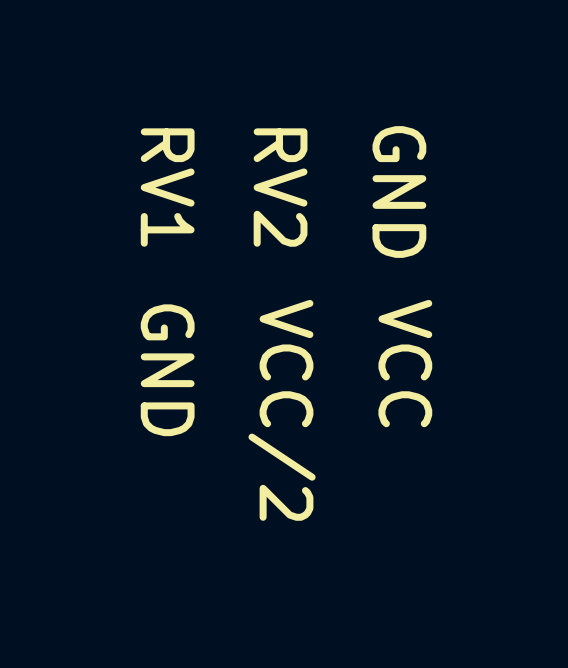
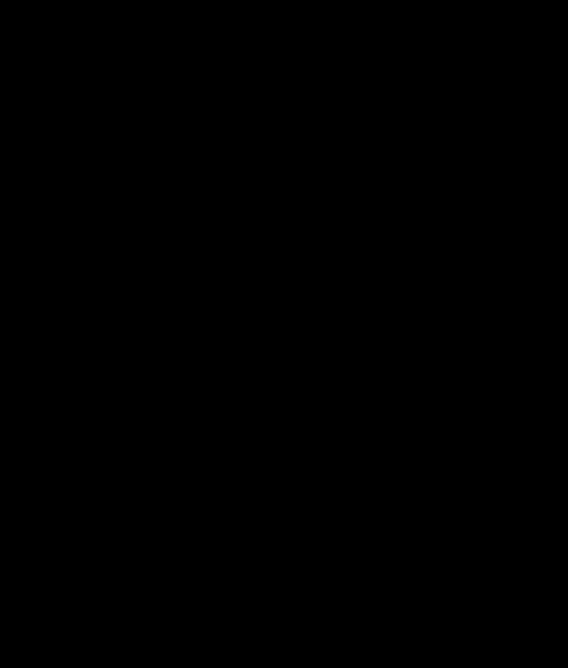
text: RV1 (167, 187) -> none
text: RV2 (280, 187) -> none
text: GND (399, 192) -> none
text: VCC (405, 363) -> none
text: GND (167, 370) -> none
text: VCC/2 (282, 410) -> none

